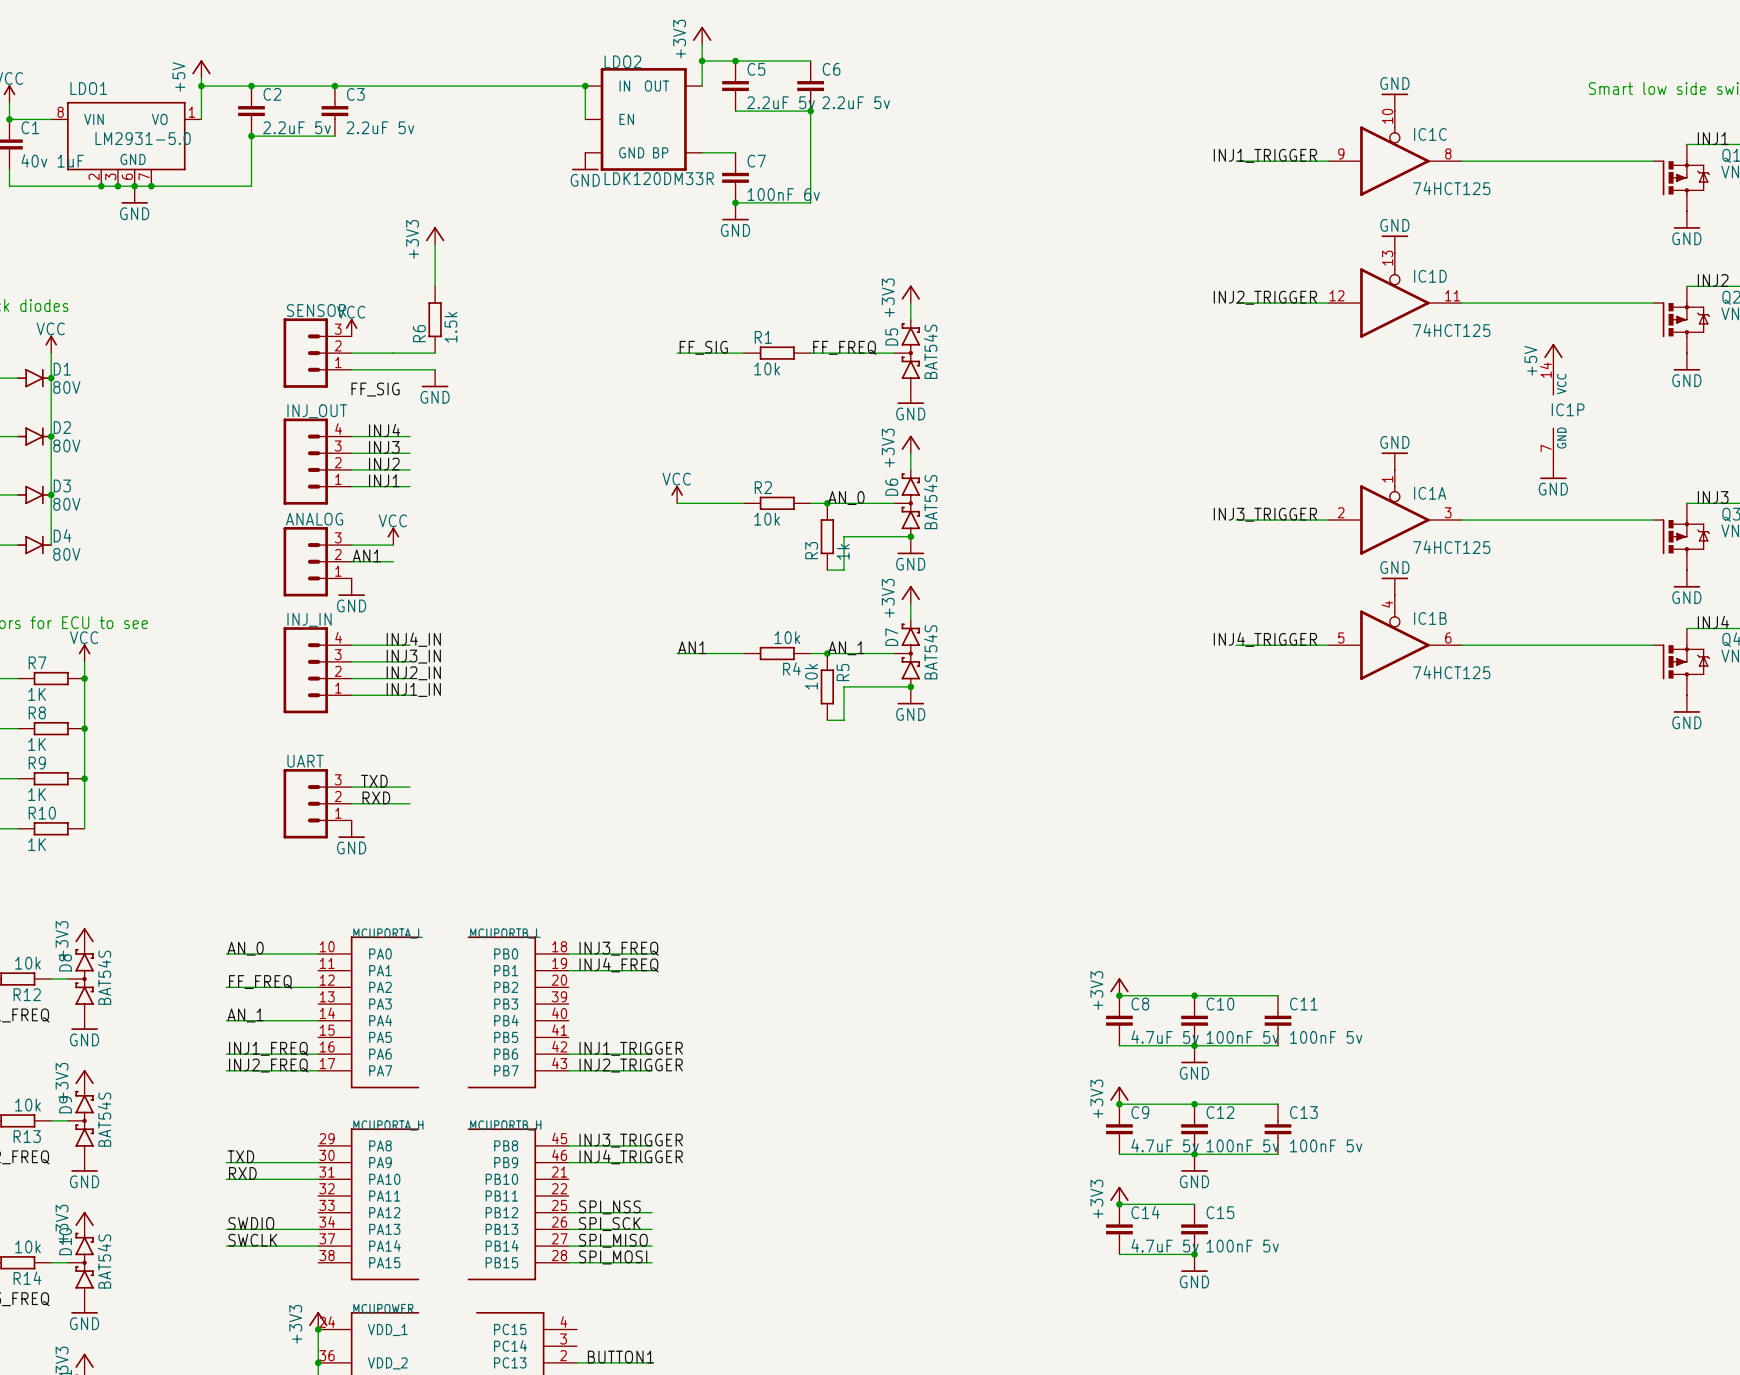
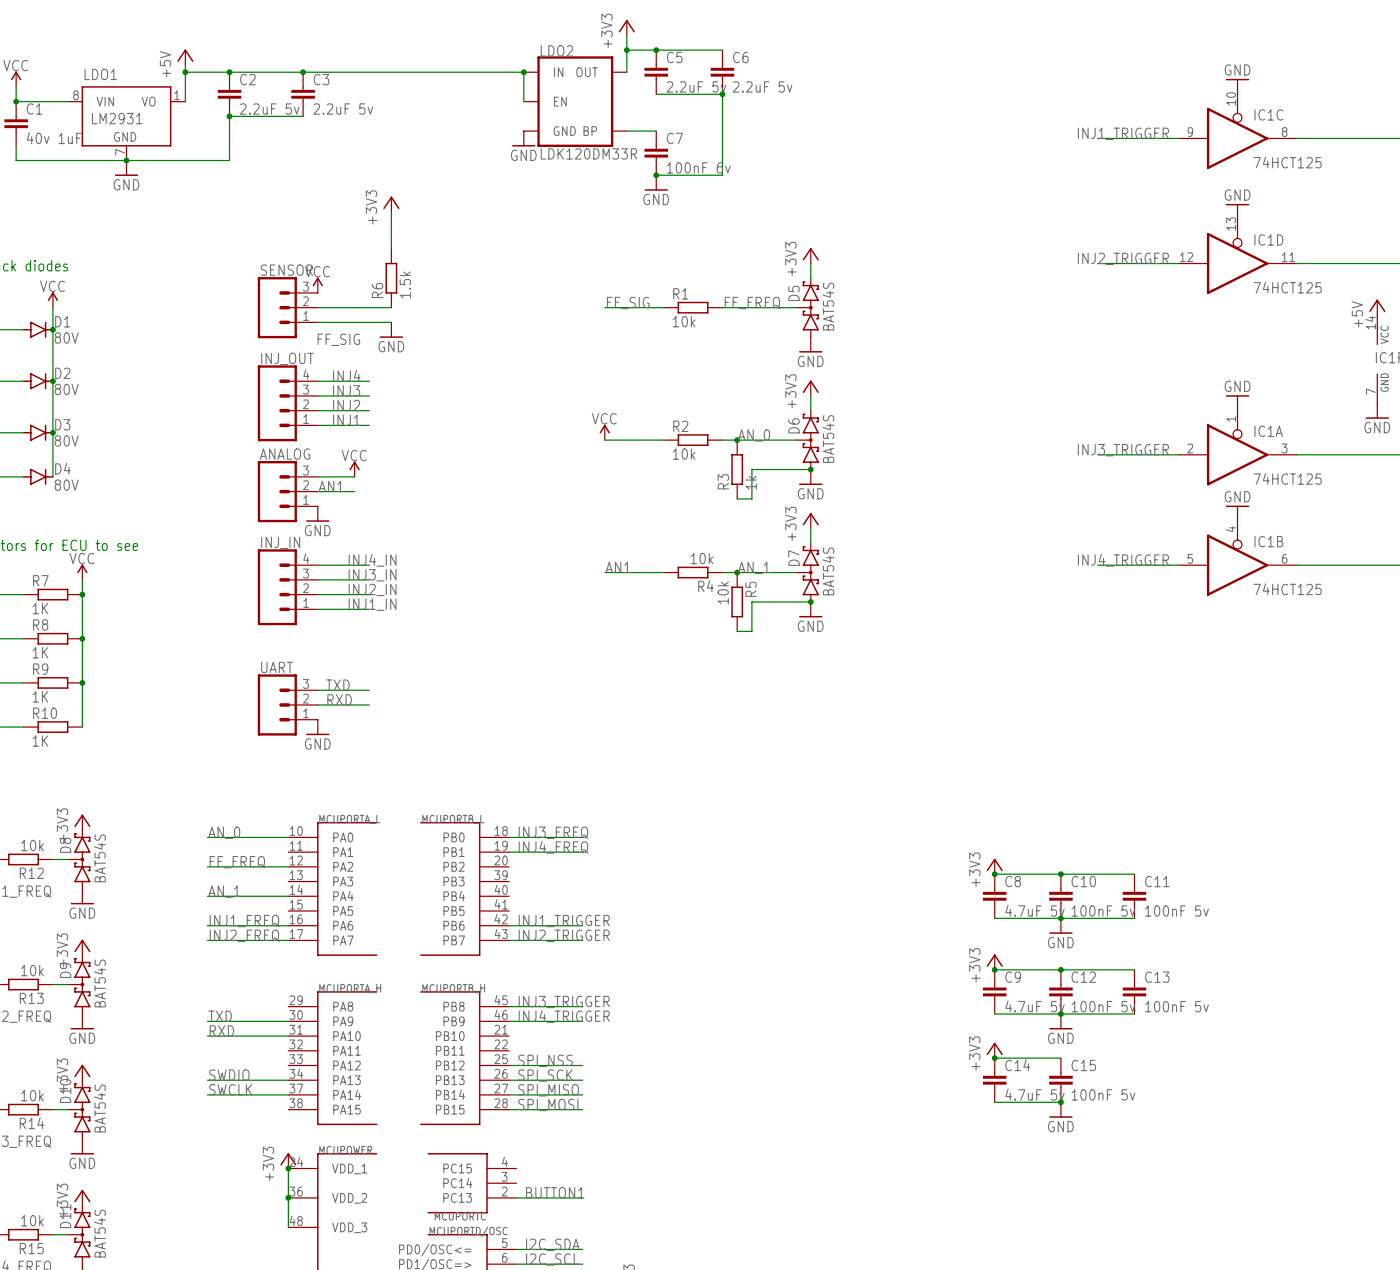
LDO1 symbol: [51, 101, 202, 187] -> [67, 86, 186, 161]
LDO1 value: LM2931-5.0 (143, 138) -> LM2931 (117, 118)
junction: (101, 186) -> none
junction: (117, 186) -> none
junction: (151, 186) -> none

